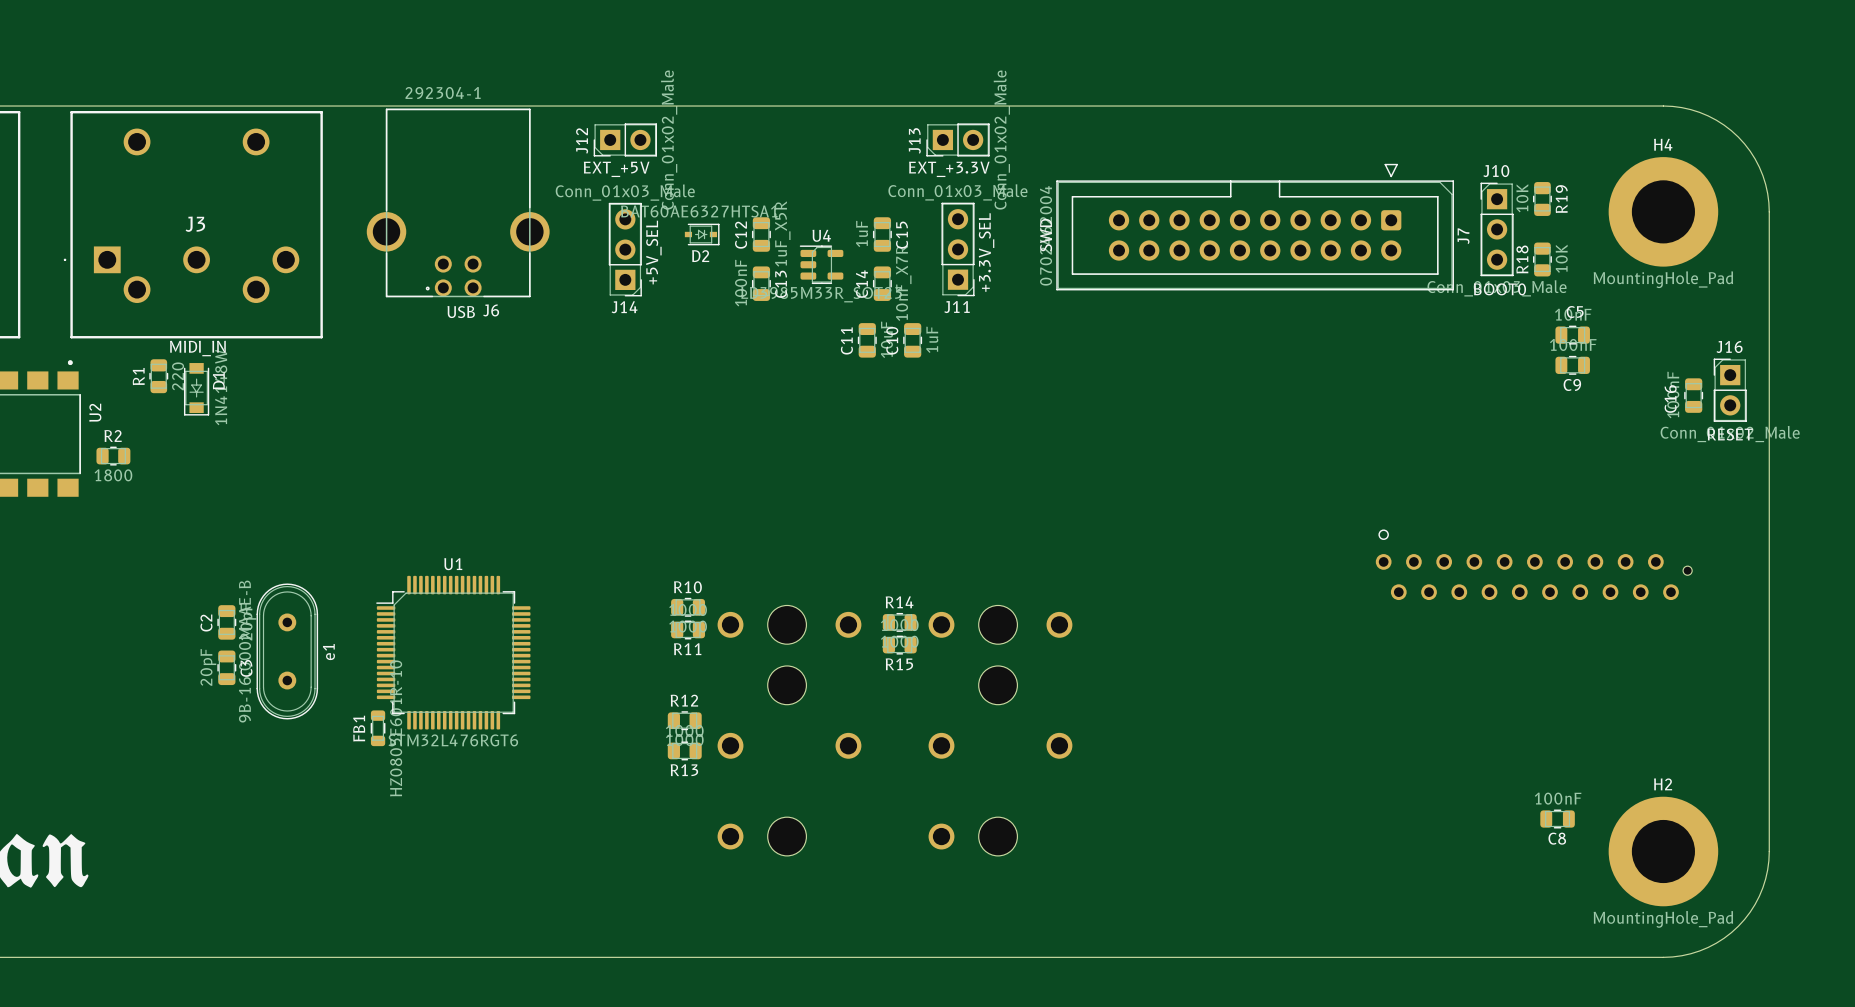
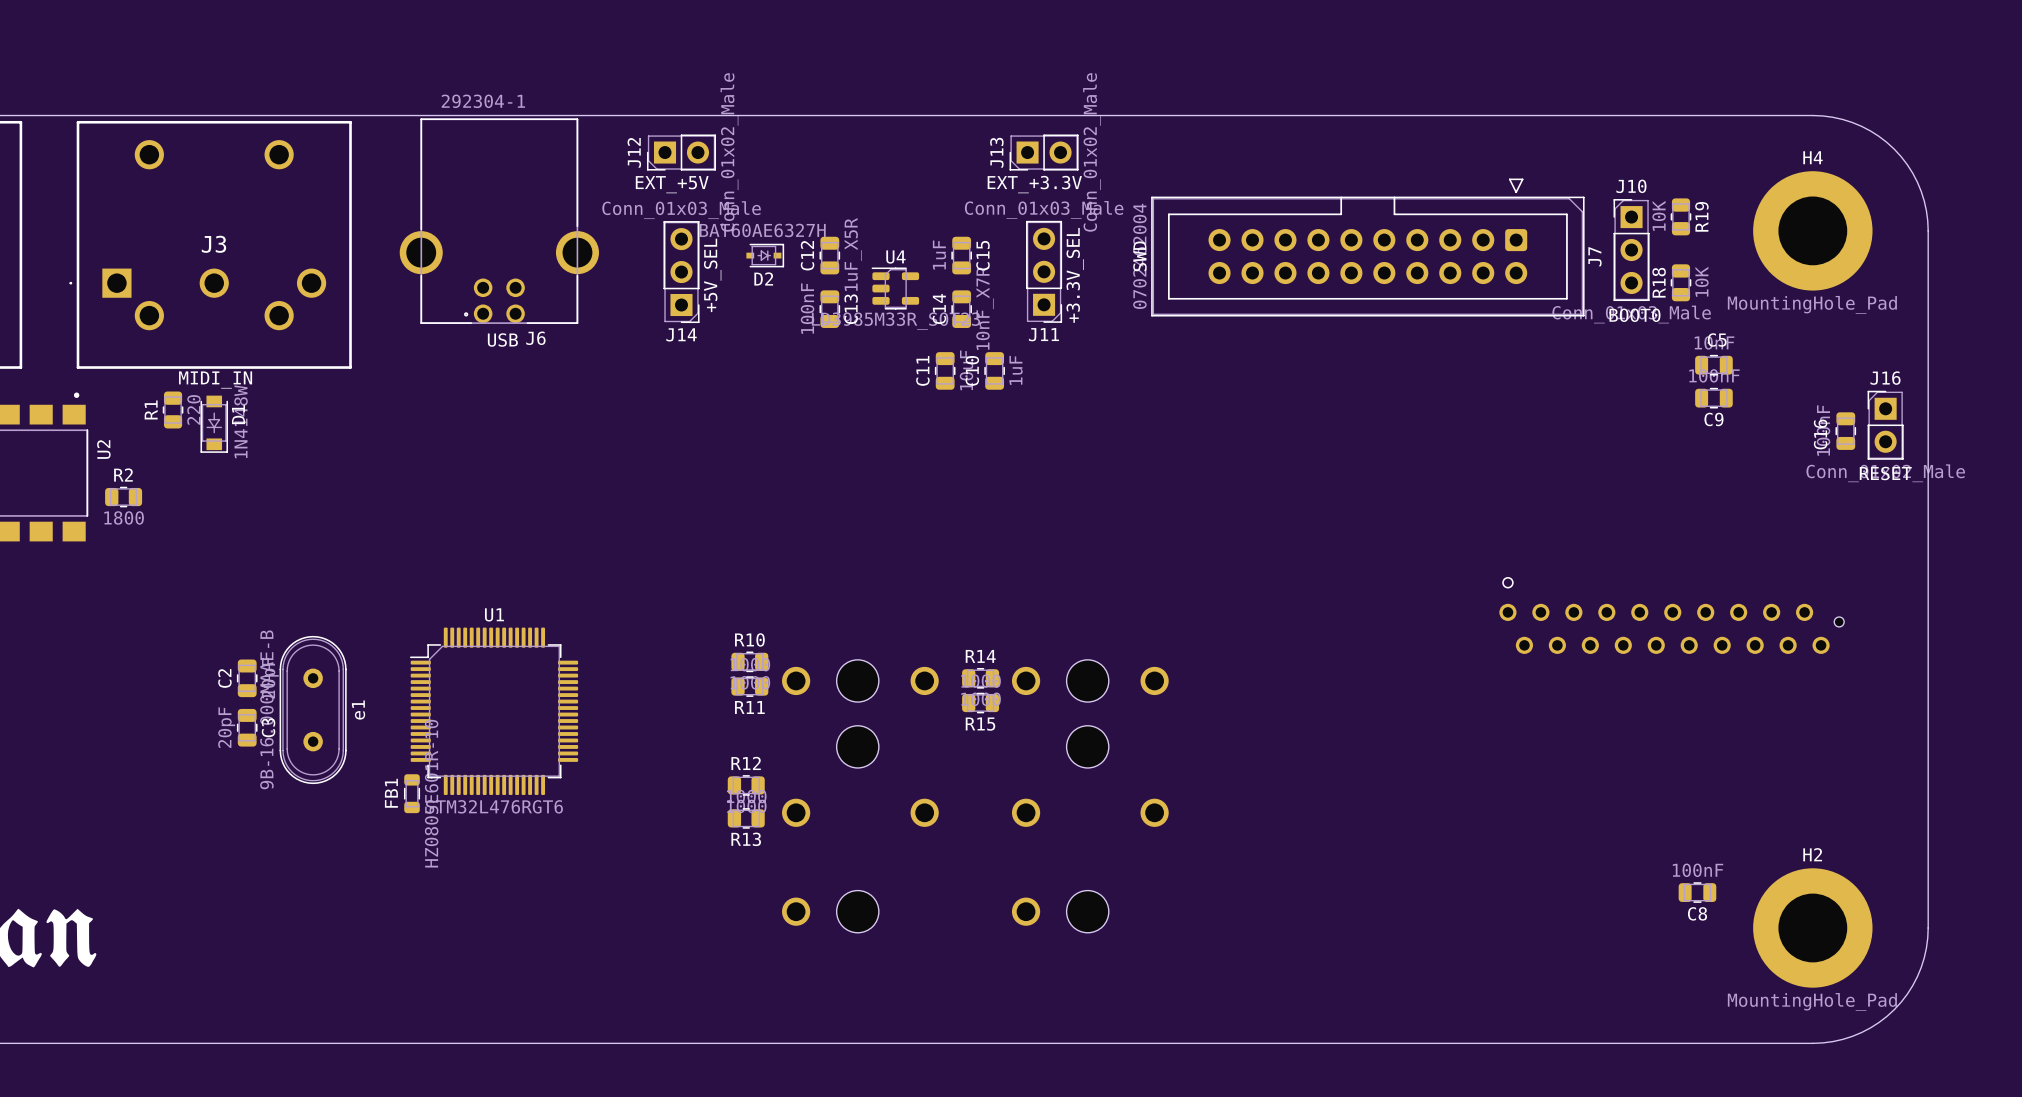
D2 value: BAT60AE6327HTSA1 (699, 211) -> BAT60AE6327H (762, 230)

